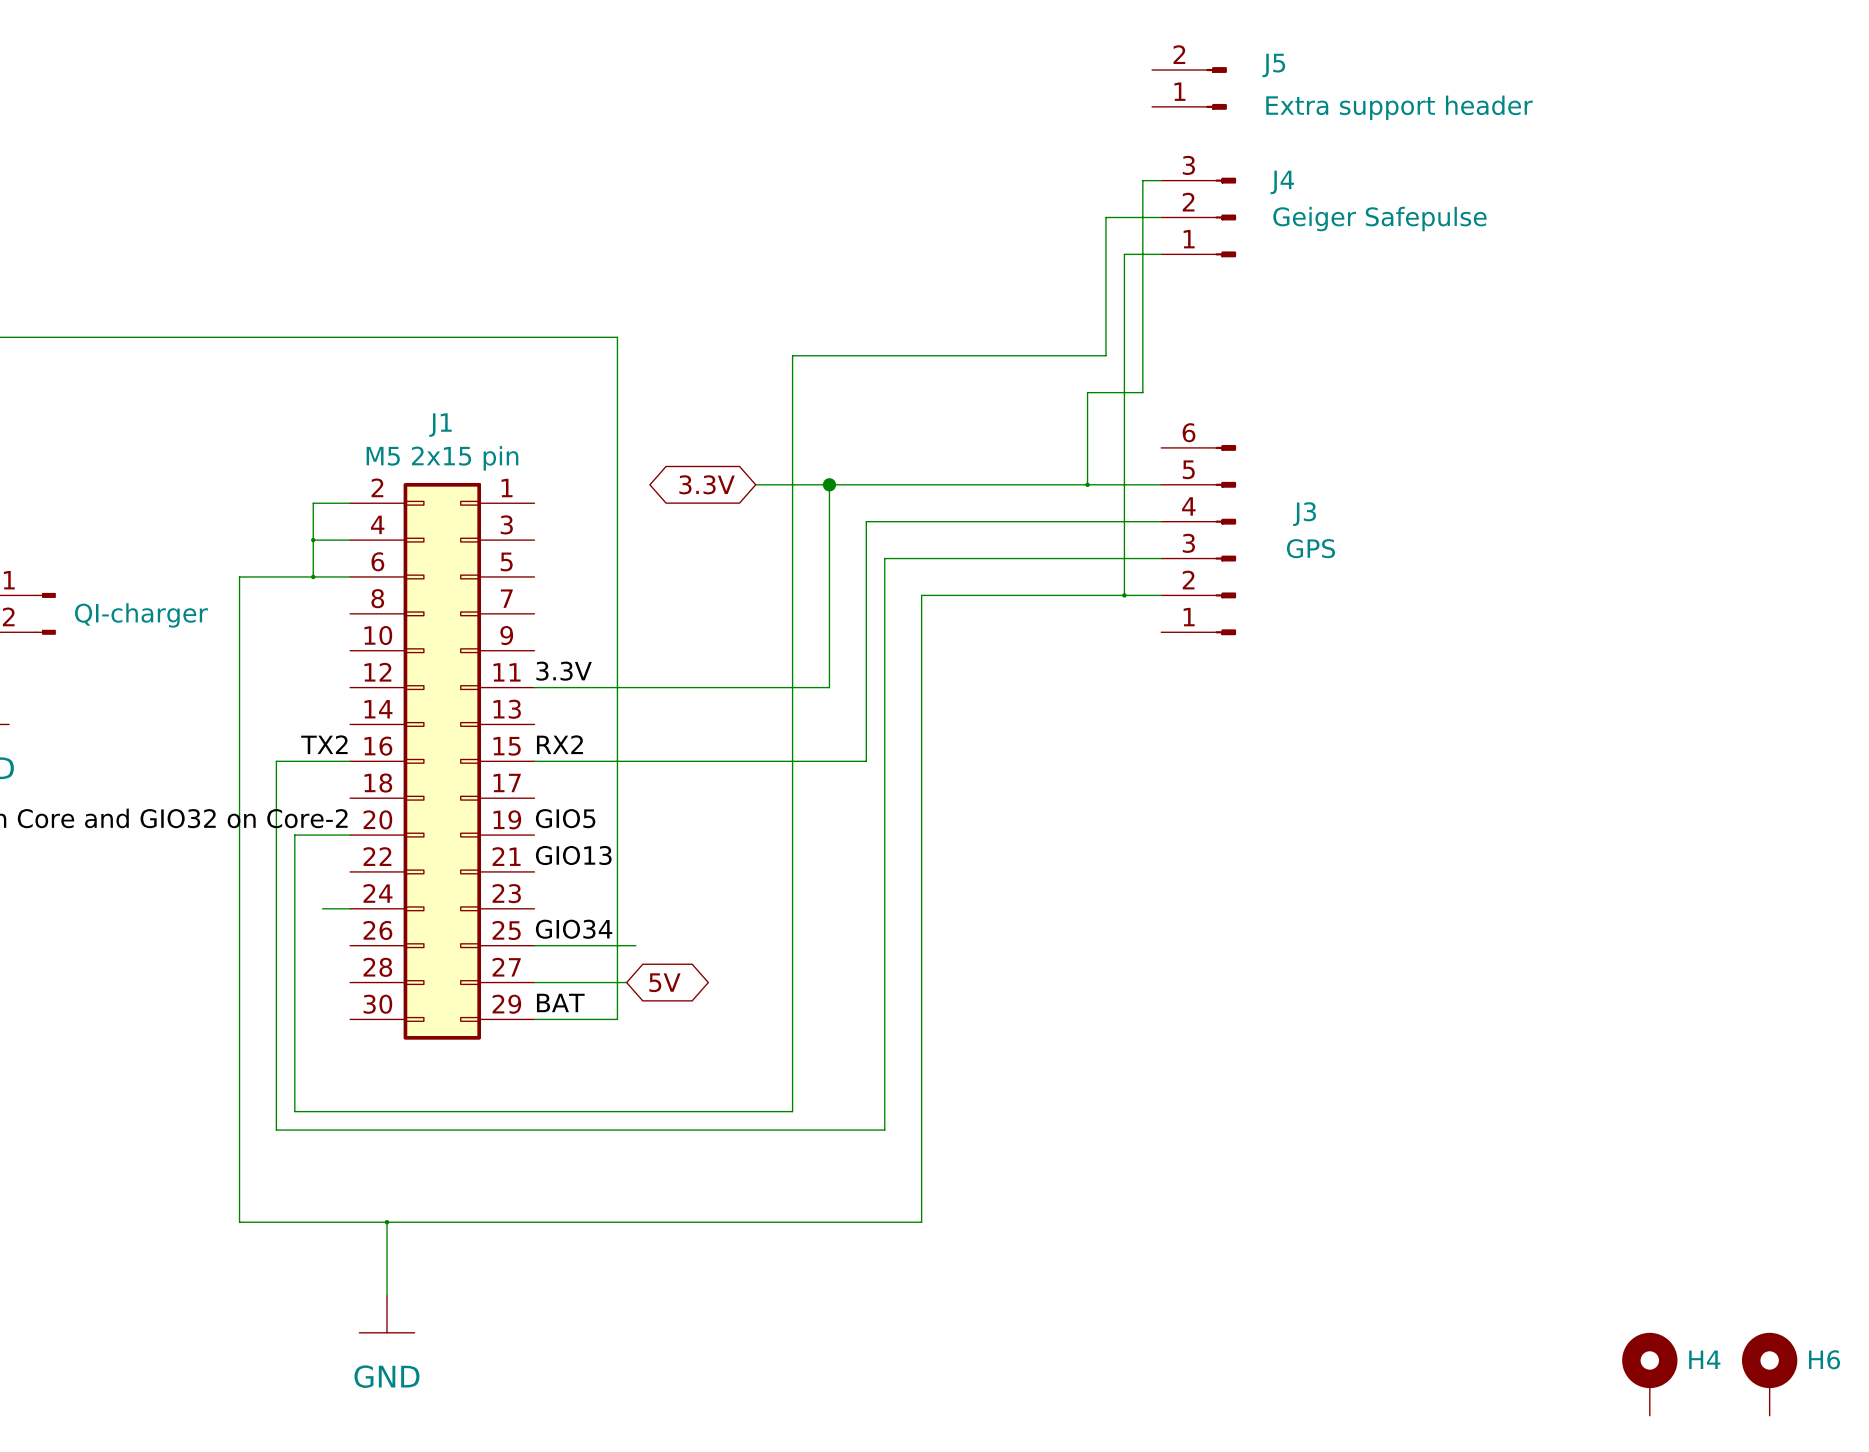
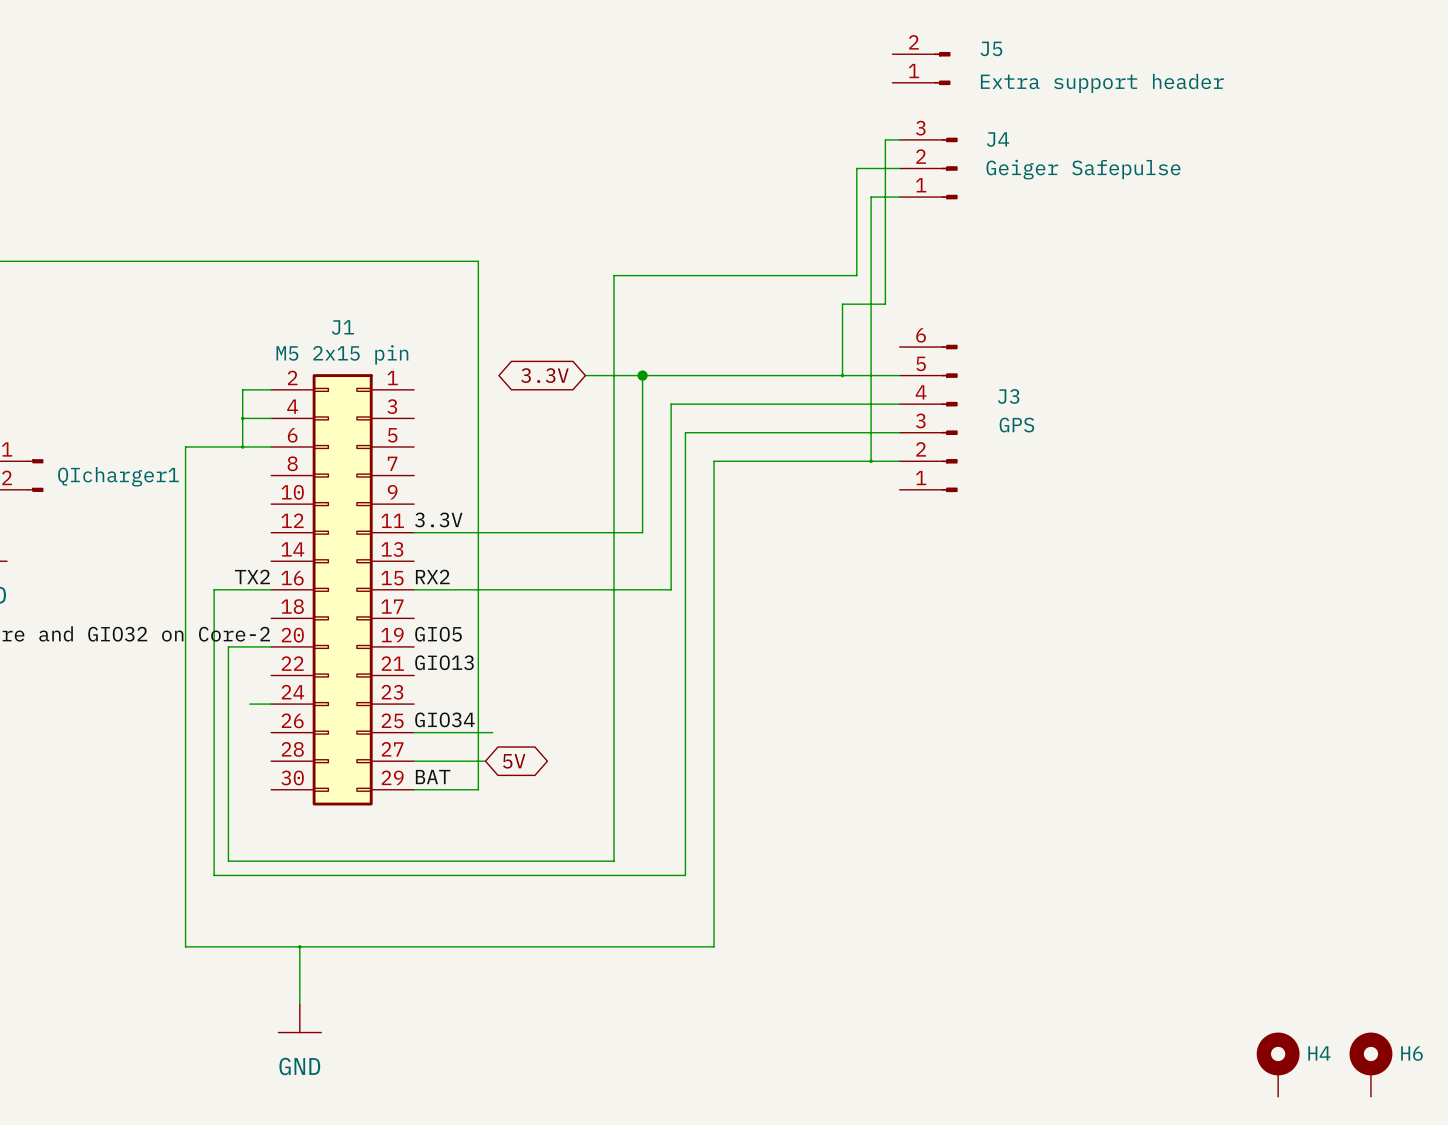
QI-charger name: QI-charger (141, 615) -> QIcharger1 (118, 476)

